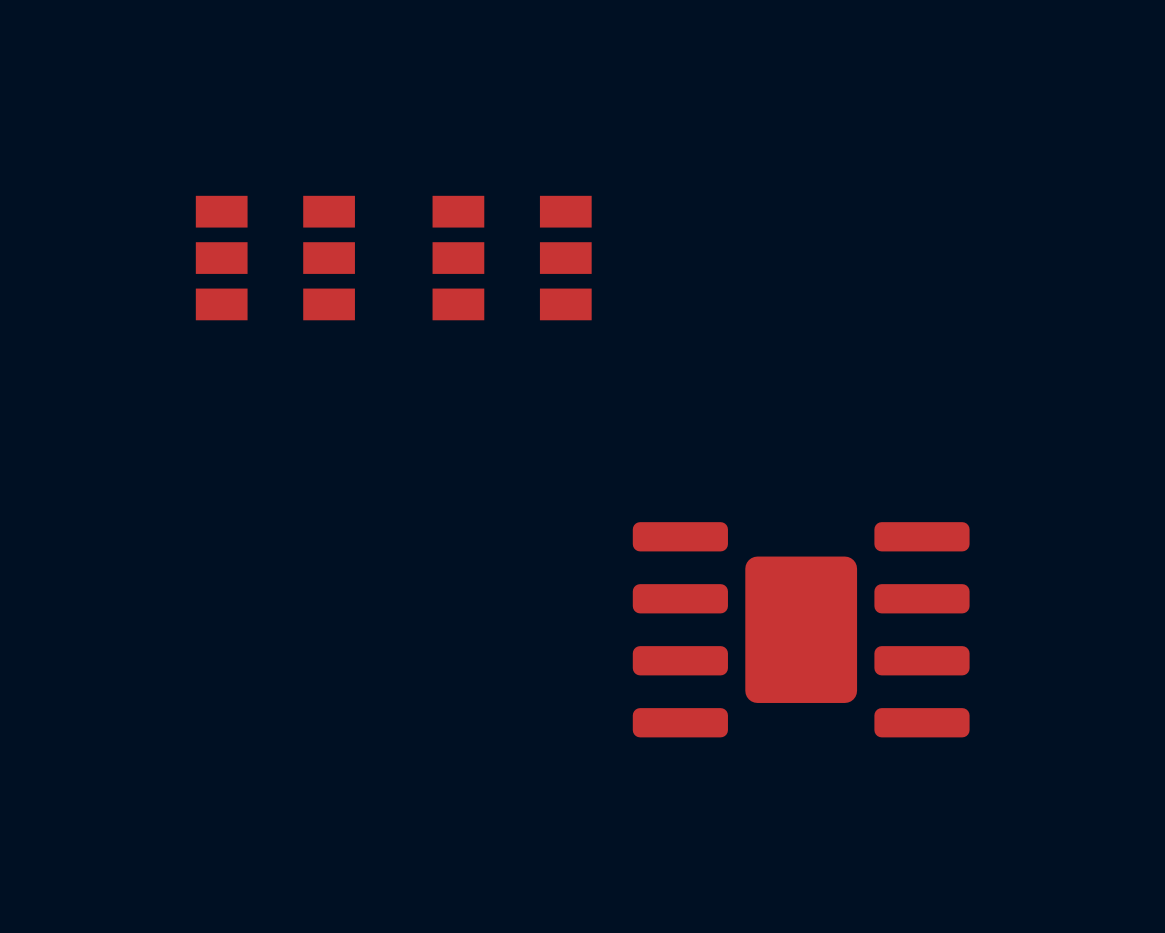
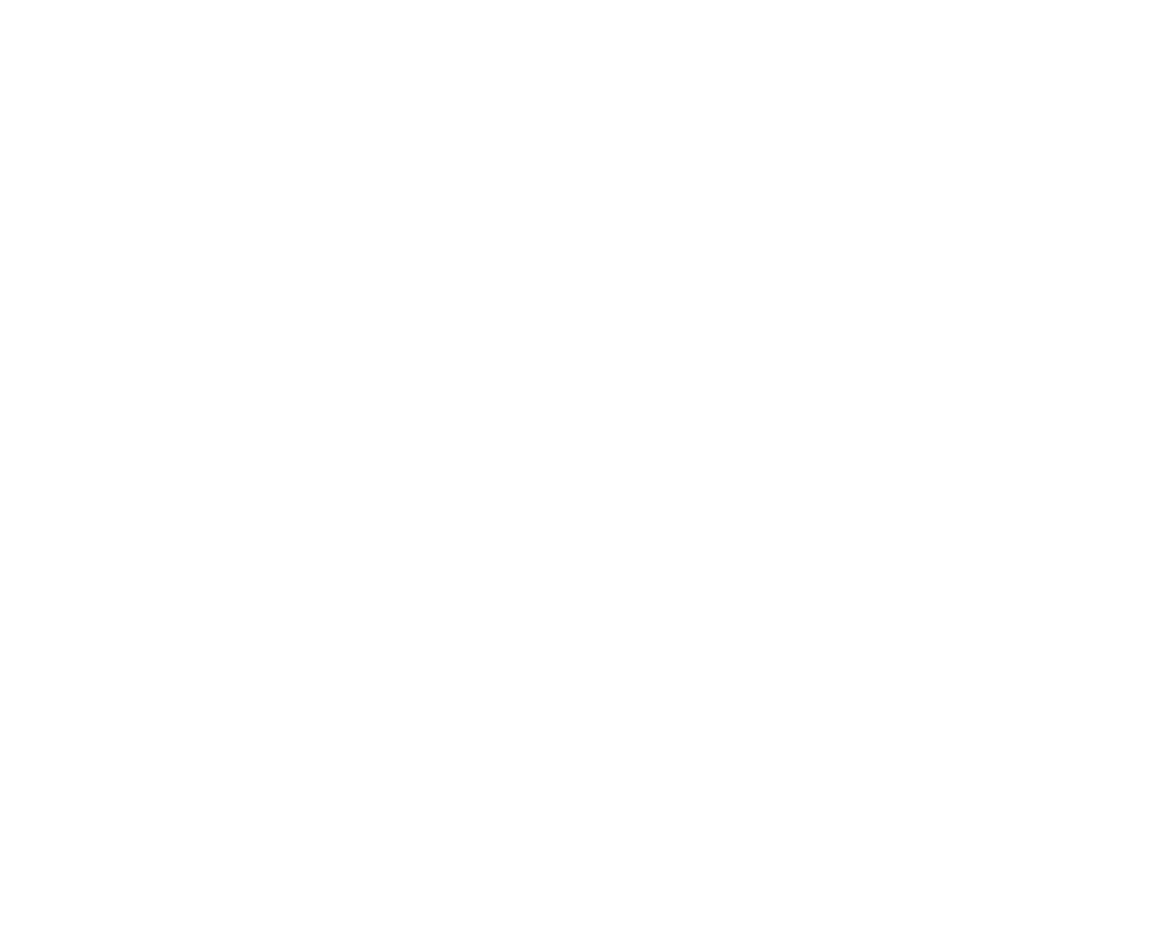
part: (275, 258) -> none
part: (512, 258) -> none
part: (801, 629) -> none

